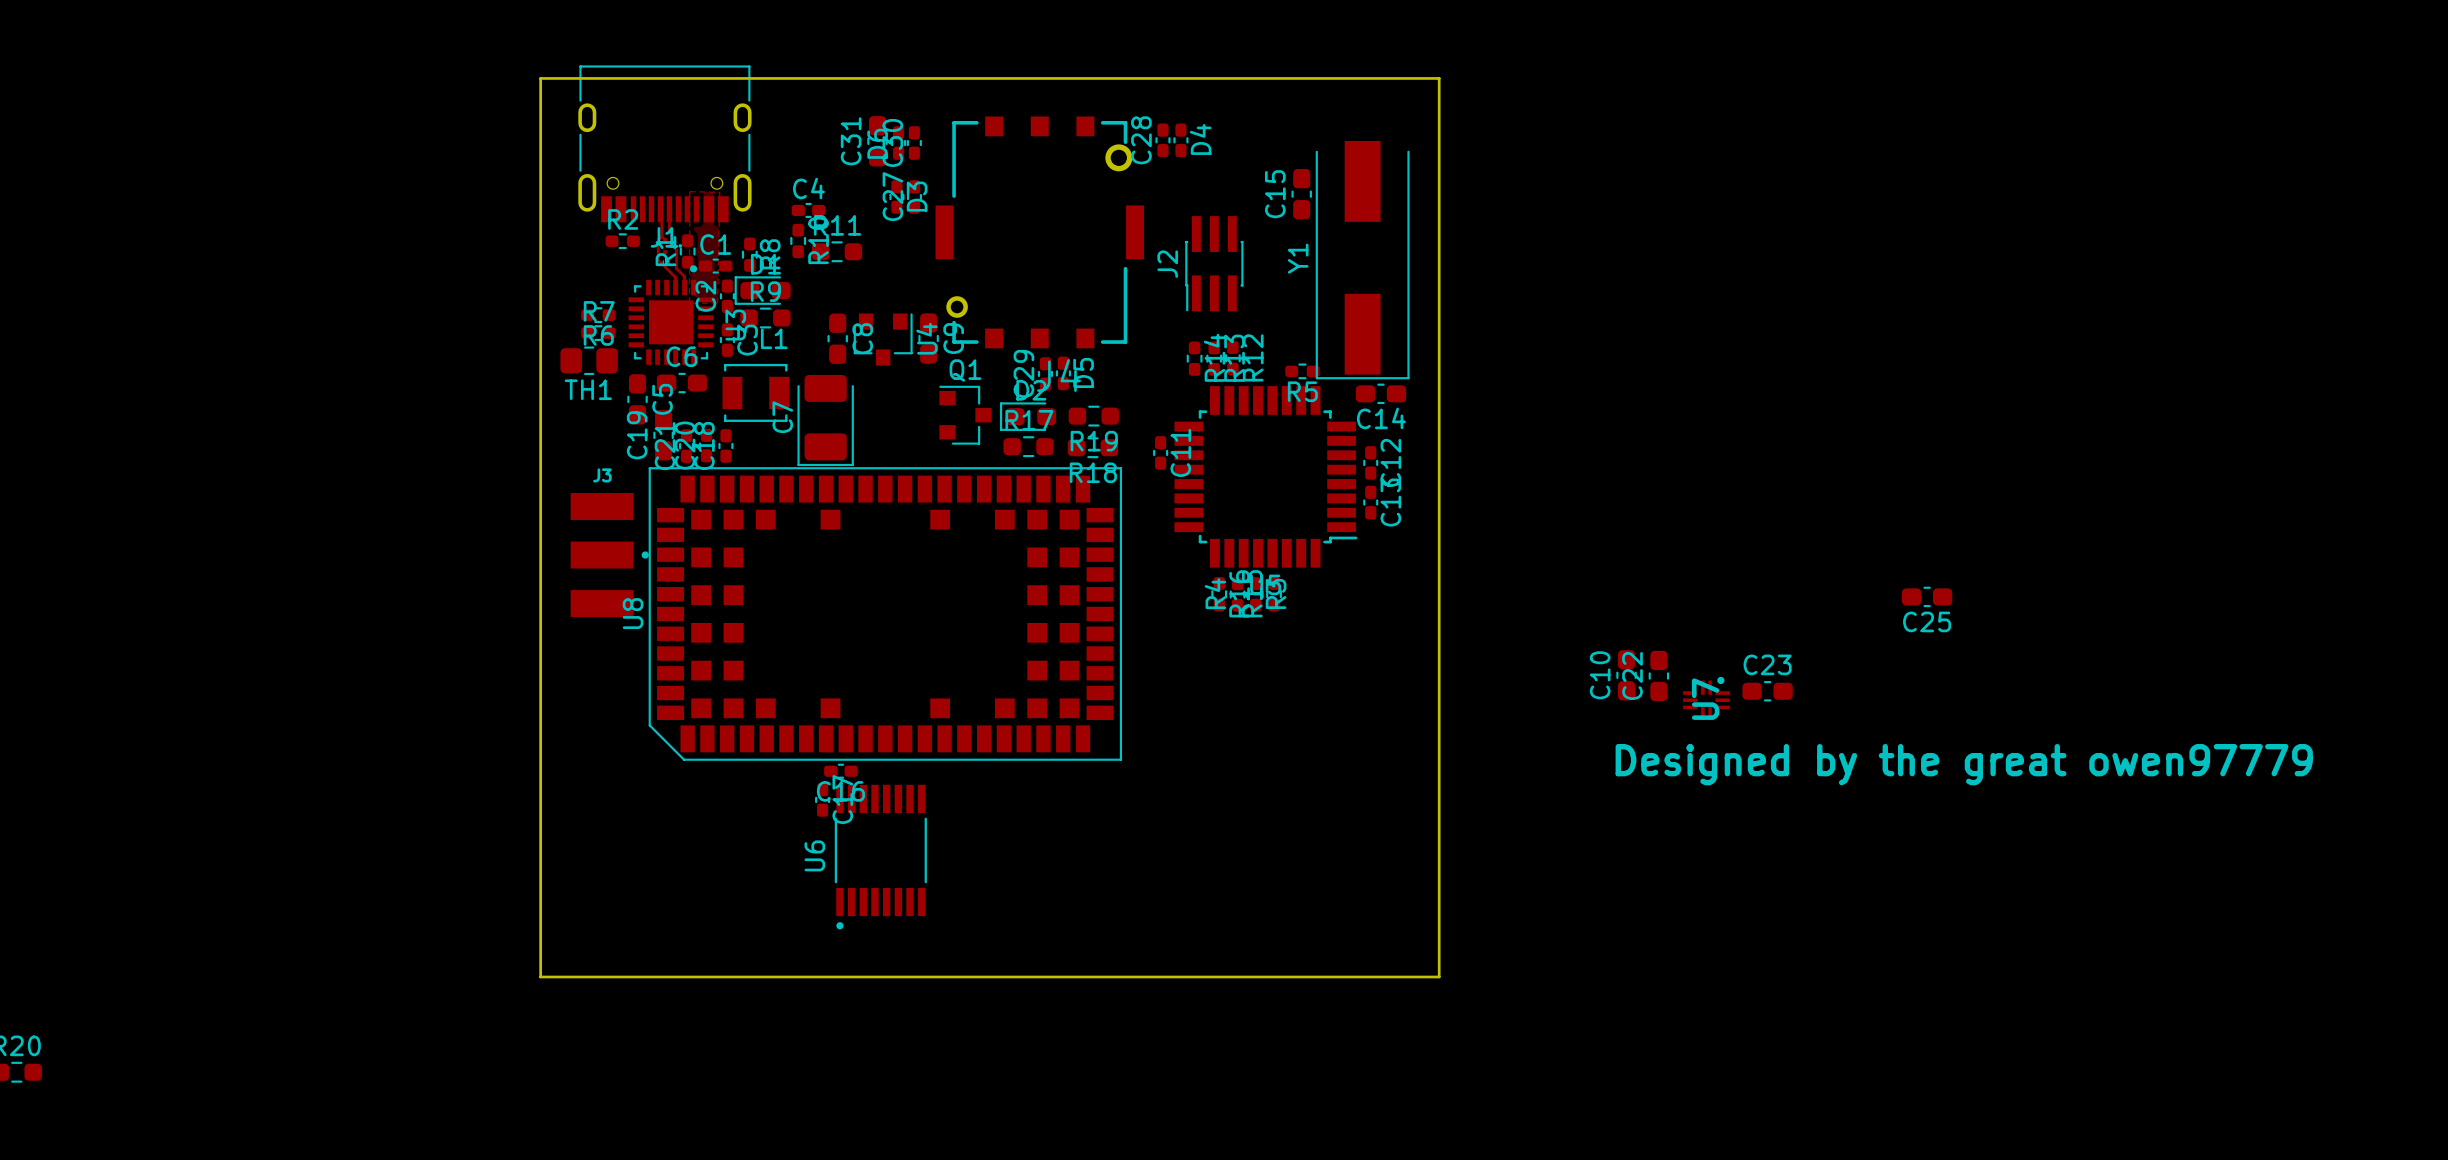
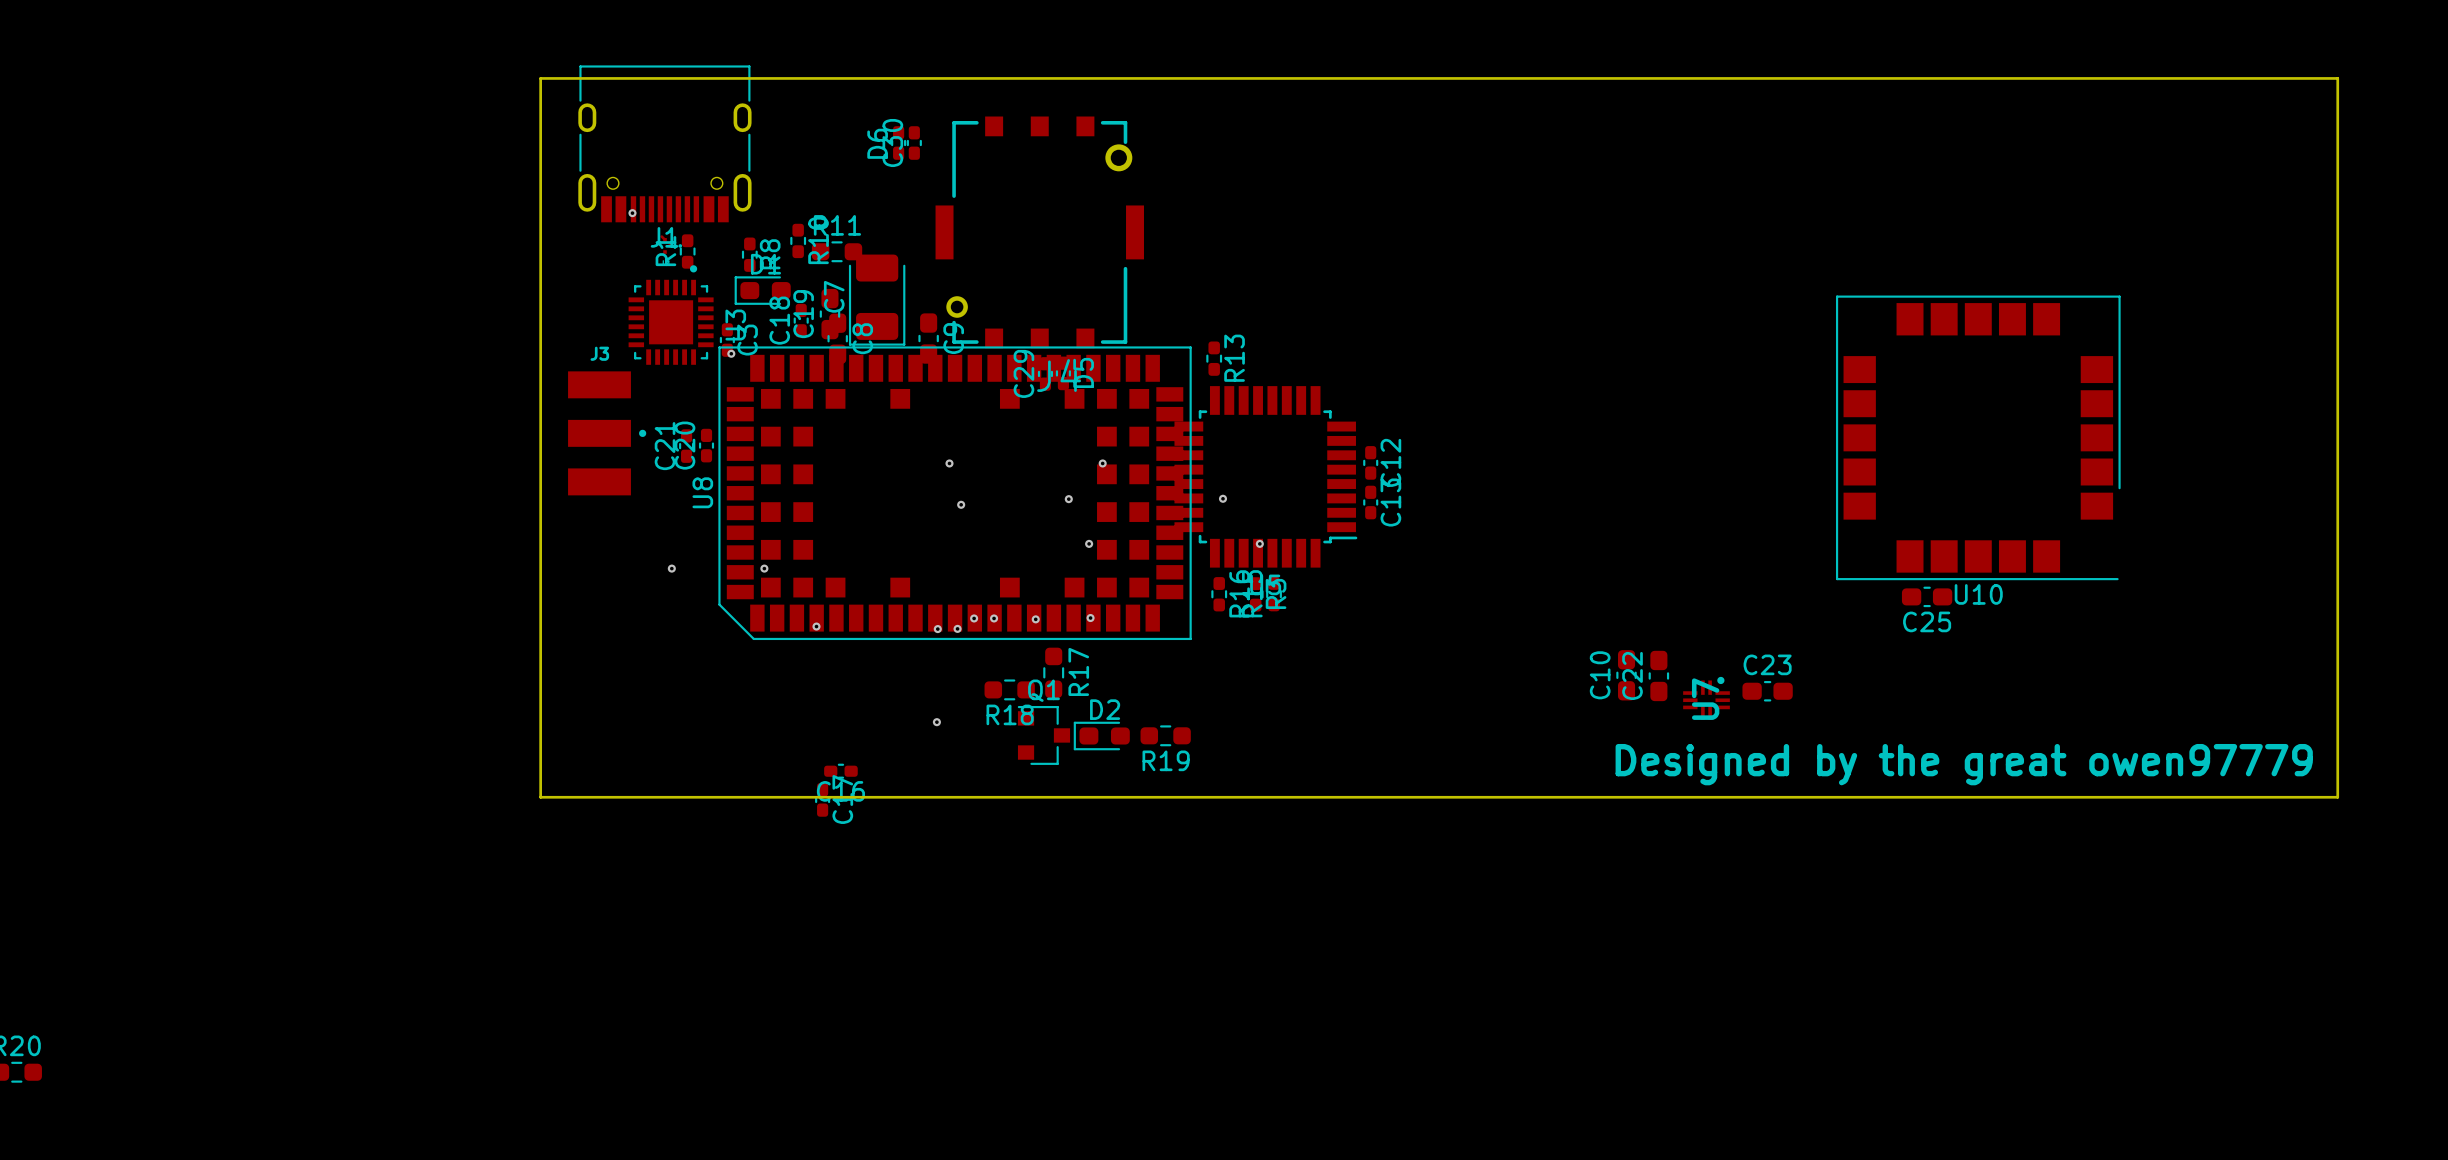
board edge: (1439, 78) (1439, 976) (540, 976) (540, 797) -> (1439, 78) (2337, 78) (2337, 797) (540, 797)
C28: (1162, 140) -> none
D4: (1180, 140) -> none
C31: (877, 141) -> none
zone outline: (689, 191) (689, 303) (717, 302) (719, 192) (689, 191) -> none
C15: (1301, 194) -> none
D3: (896, 197) -> none
C27: (914, 197) -> none
track: (660, 209) (661, 236) (658, 240) (658, 260) (675, 277) (675, 287) -> none
track: (669, 209) (669, 231) (671, 234) (670, 245) (676, 250) (676, 268) (684, 276) (684, 287) -> none
C4: (808, 210) -> none
via: none -> (632, 213)
R2: (622, 241) -> none
Y1: (1362, 260) -> none
J2: (1214, 263) -> none
C1: (715, 266) -> none
C2: (727, 296) -> none
R6: (598, 315) -> none
R9: (765, 317) -> none
R7: (598, 333) -> none
U4: (883, 339) -> none
via: none -> (731, 353)
R14: (1194, 358) -> none
R12: (1232, 358) -> none
TH1: (589, 360) -> none
R5: (1302, 371) -> none
C6: (682, 383) -> none
L1: (755, 392) -> none
C14: (1380, 393) -> none
C5: (637, 399) -> none
Q1 position: (965, 415) -> (1043, 735)
D2 position: (1028, 416) -> (1101, 735)
R19 position: (1093, 416) -> (1165, 735)
C7 position: (825, 420) -> (877, 300)
C19 position: (663, 435) -> (829, 314)
U10: none -> (1978, 437)
C18 position: (725, 445) -> (801, 320)
R17 rotation: 0° (1028, 446) -> 90° clockwise (1053, 672)
R17 position: (1028, 446) -> (1053, 672)
R18 position: (1092, 447) -> (1009, 689)
C11: (1160, 452) -> none
via: none -> (949, 463)
via: none -> (1102, 463)
via: none -> (1223, 498)
via: none -> (1068, 499)
via: none -> (961, 504)
via: none -> (1089, 543)
via: none -> (1259, 543)
J3 position: (609, 555) -> (607, 433)
via: none -> (671, 568)
via: none -> (764, 568)
R4: (1237, 594) -> none
U8 position: (885, 613) -> (955, 493)
via: none -> (974, 618)
via: none -> (994, 618)
via: none -> (1090, 618)
via: none -> (1035, 619)
via: none -> (816, 626)
via: none -> (957, 628)
via: none -> (937, 629)
via: none -> (936, 722)
U6: (880, 857) -> none

